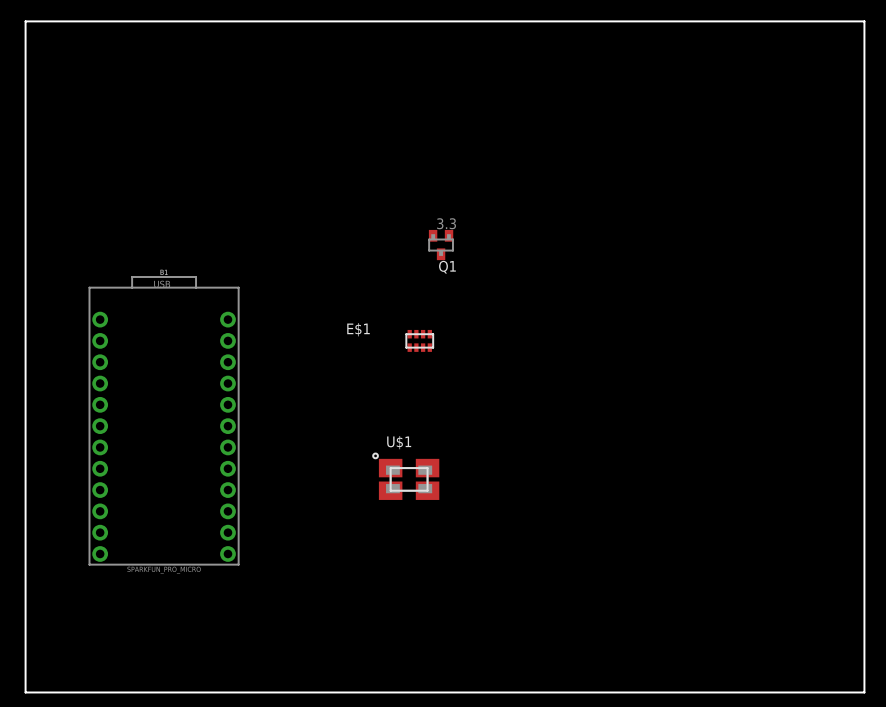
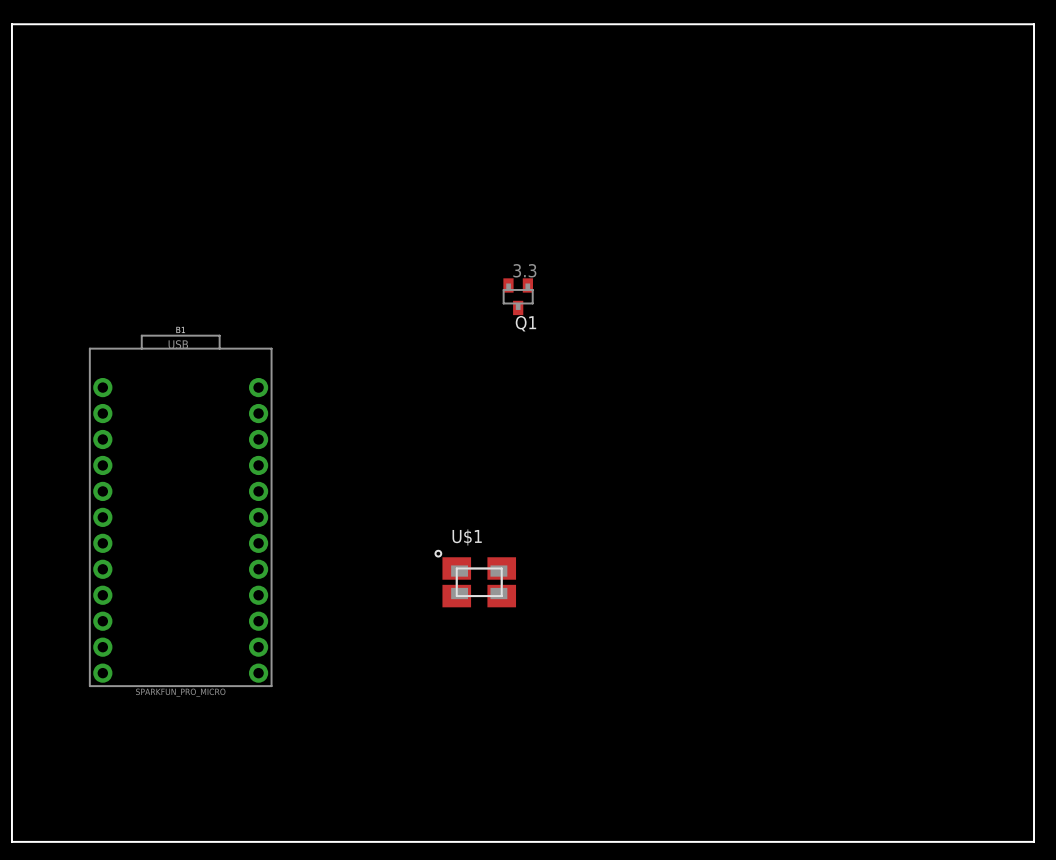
E$1: (419, 340) -> none

